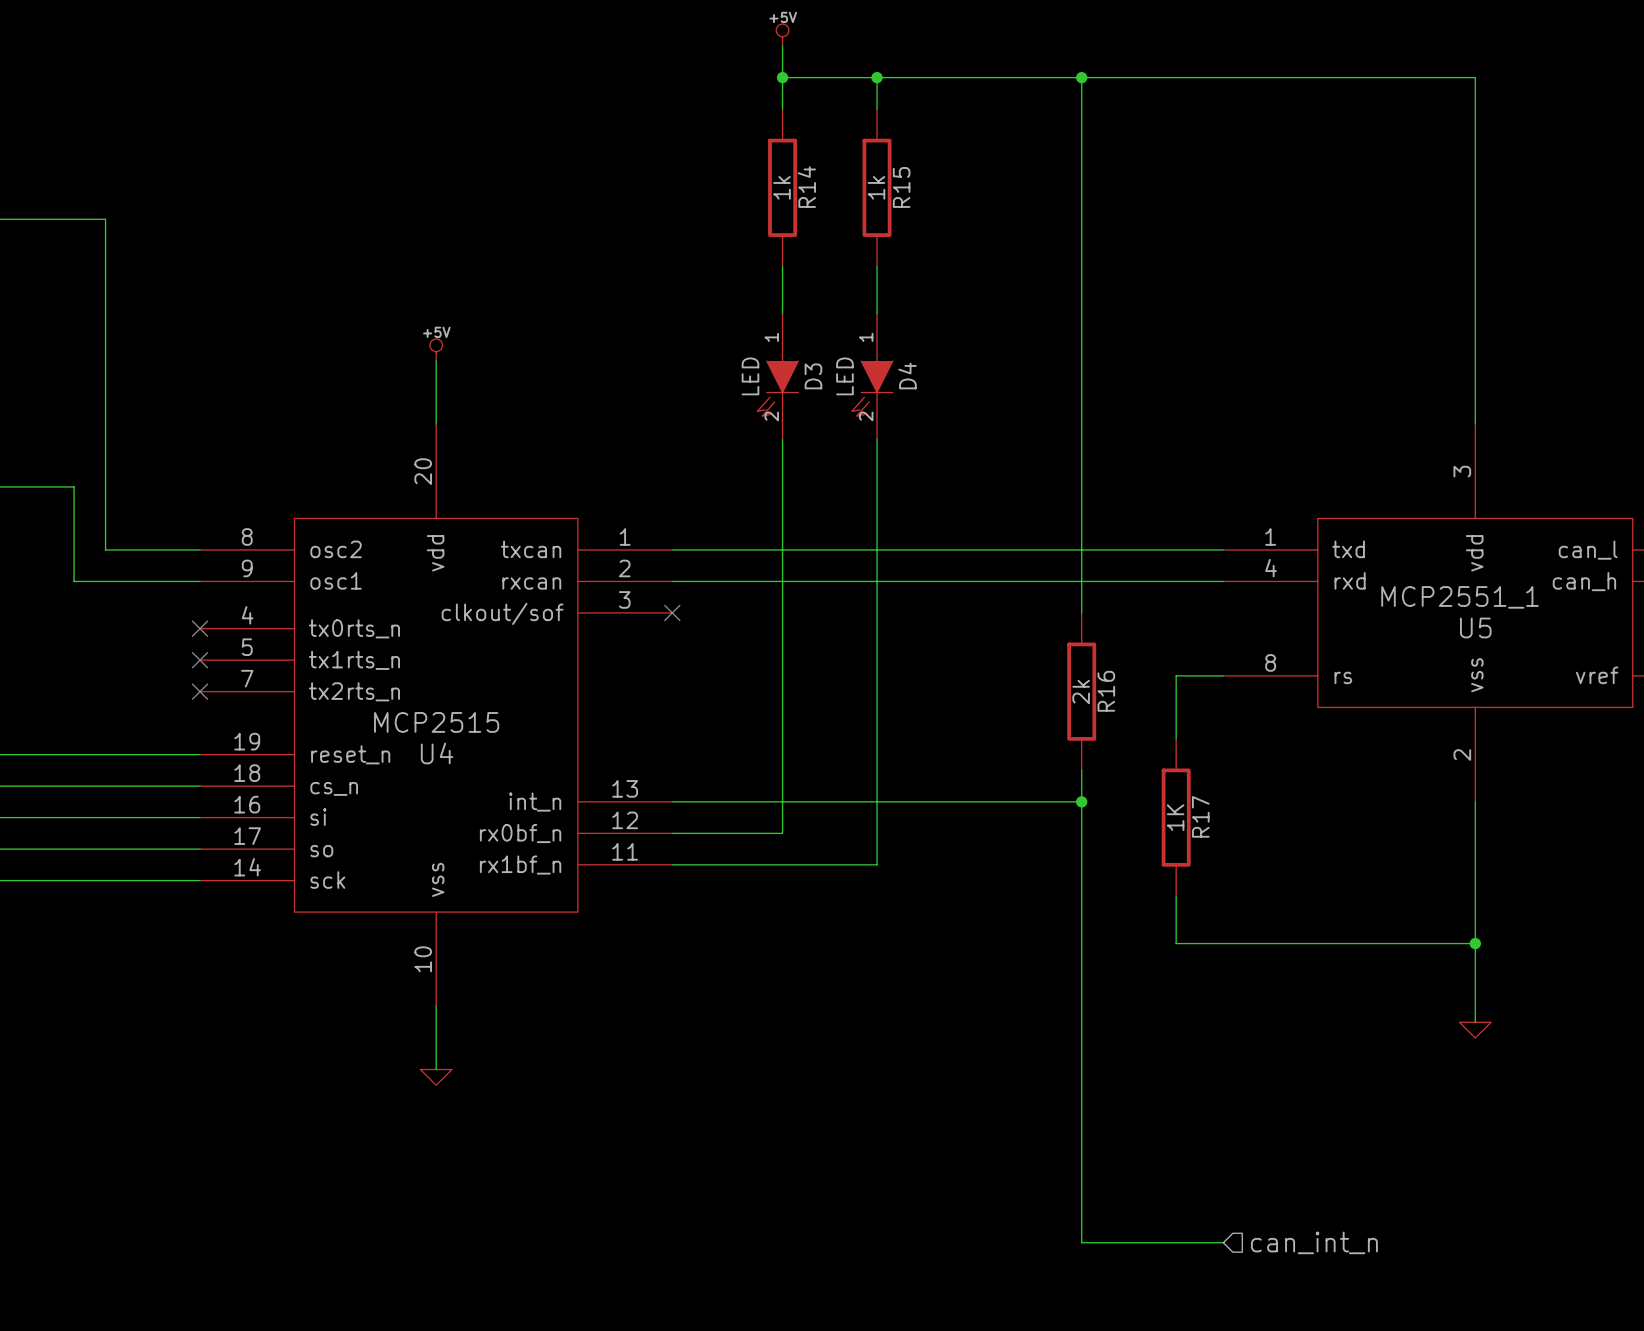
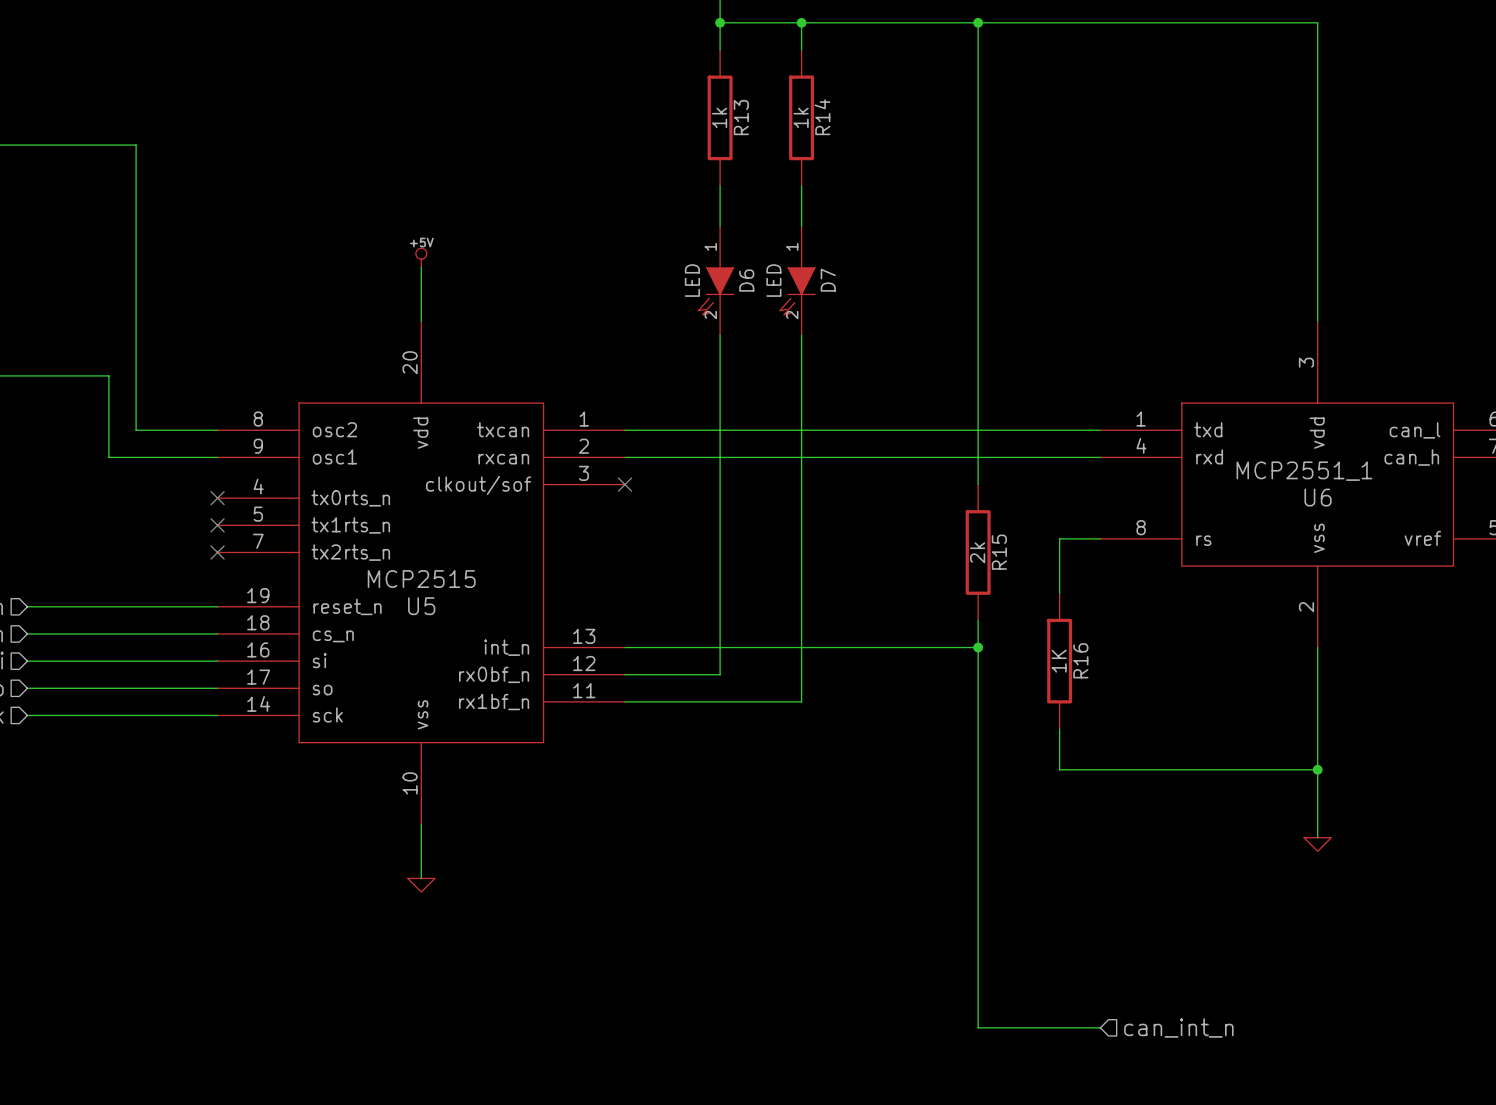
R14 name: R14 (806, 187) -> R13 (741, 117)
R15 name: R15 (901, 187) -> R14 (822, 117)
D3 name: D3 (813, 376) -> D6 (746, 280)
D4 name: D4 (907, 376) -> D7 (828, 280)
U5 name: U5 (1475, 627) -> U6 (1318, 497)
R16 name: R16 (1106, 691) -> R15 (999, 552)
U4 name: U4 (437, 753) -> U5 (421, 606)
R17 name: R17 (1200, 816) -> R16 (1080, 660)

